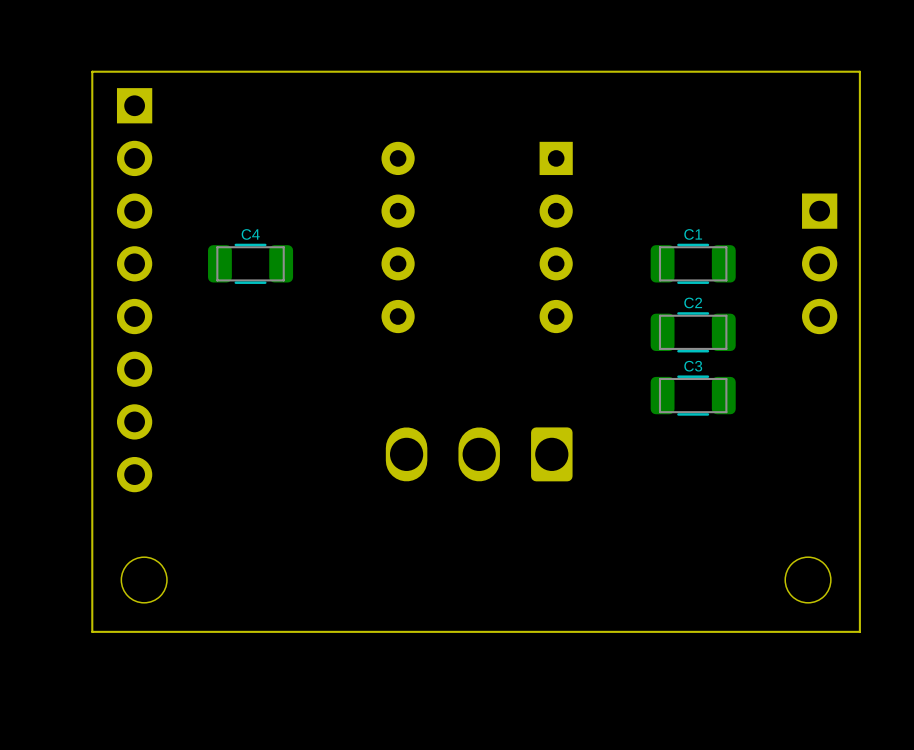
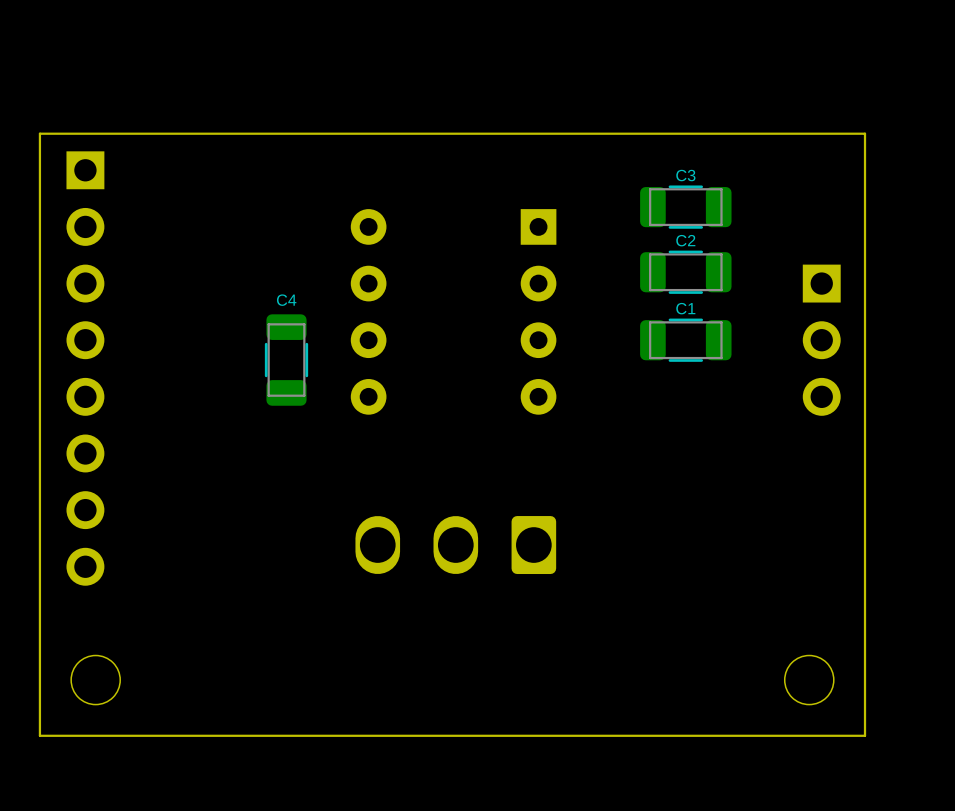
C4 rotation: 0° (250, 263) -> 90° clockwise (286, 360)
C4 position: (250, 263) -> (286, 360)
C2 position: (693, 332) -> (685, 272)
C3 position: (693, 395) -> (685, 207)

